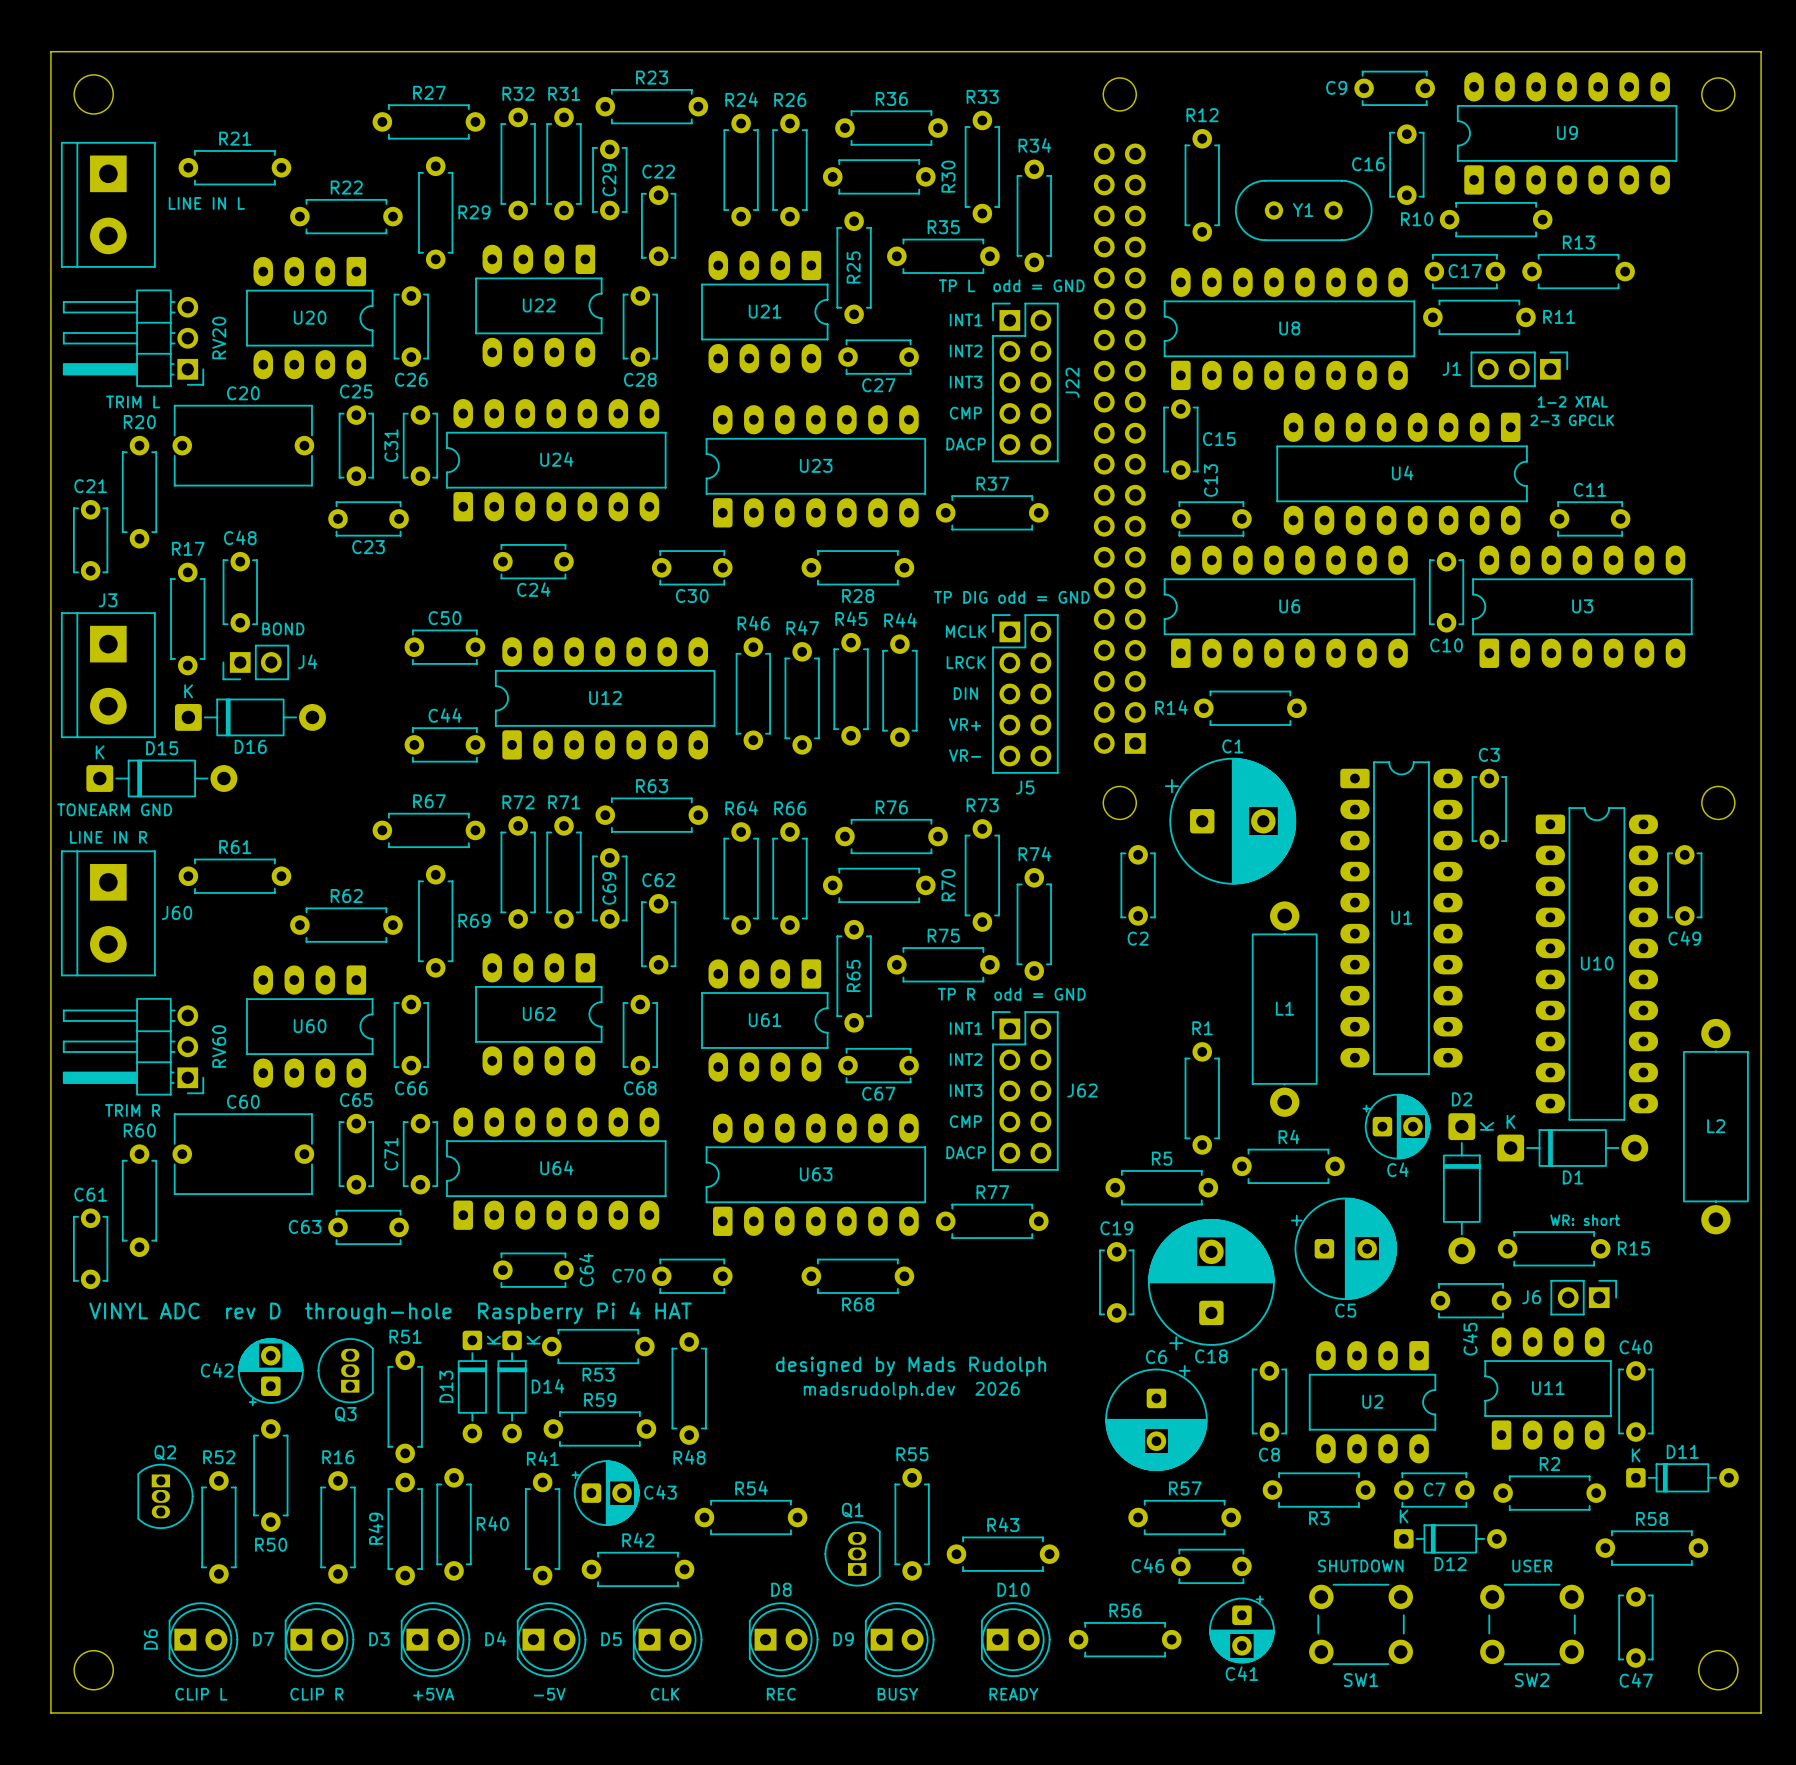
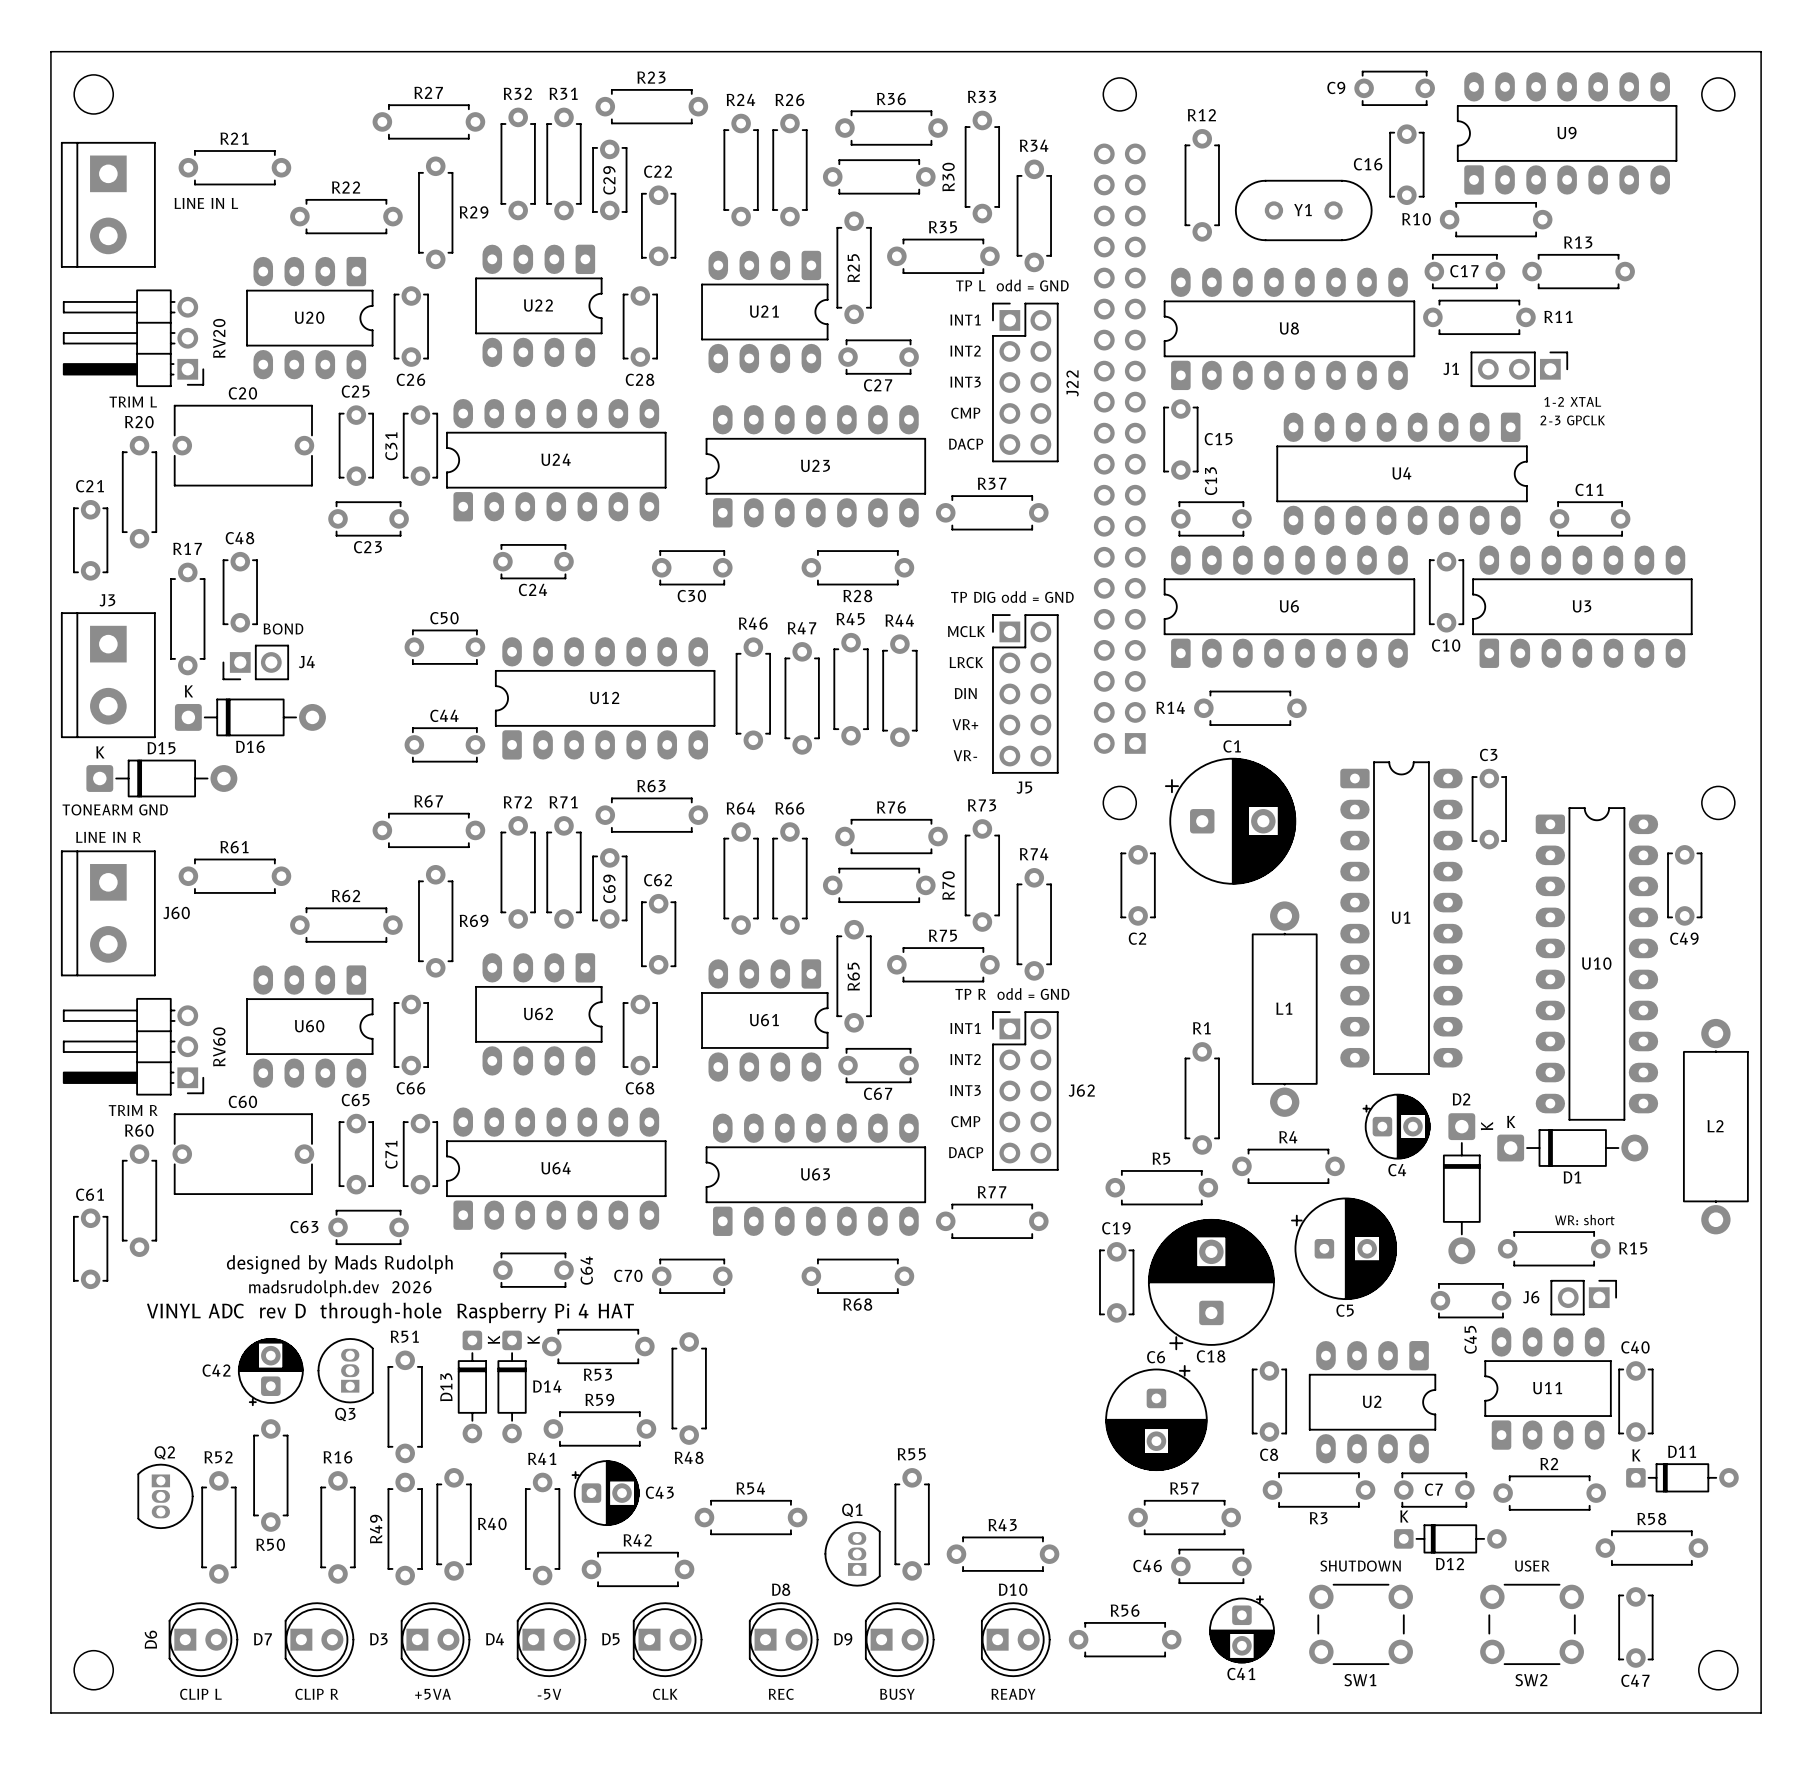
text: none -> designed by Mads Rudolph (339, 1264)
text: none -> madsrudolph.dev 2026 (340, 1288)
text: designed by Mads Rudolph (911, 1366) -> none
text: madsrudolph.dev 2026 (911, 1390) -> none

